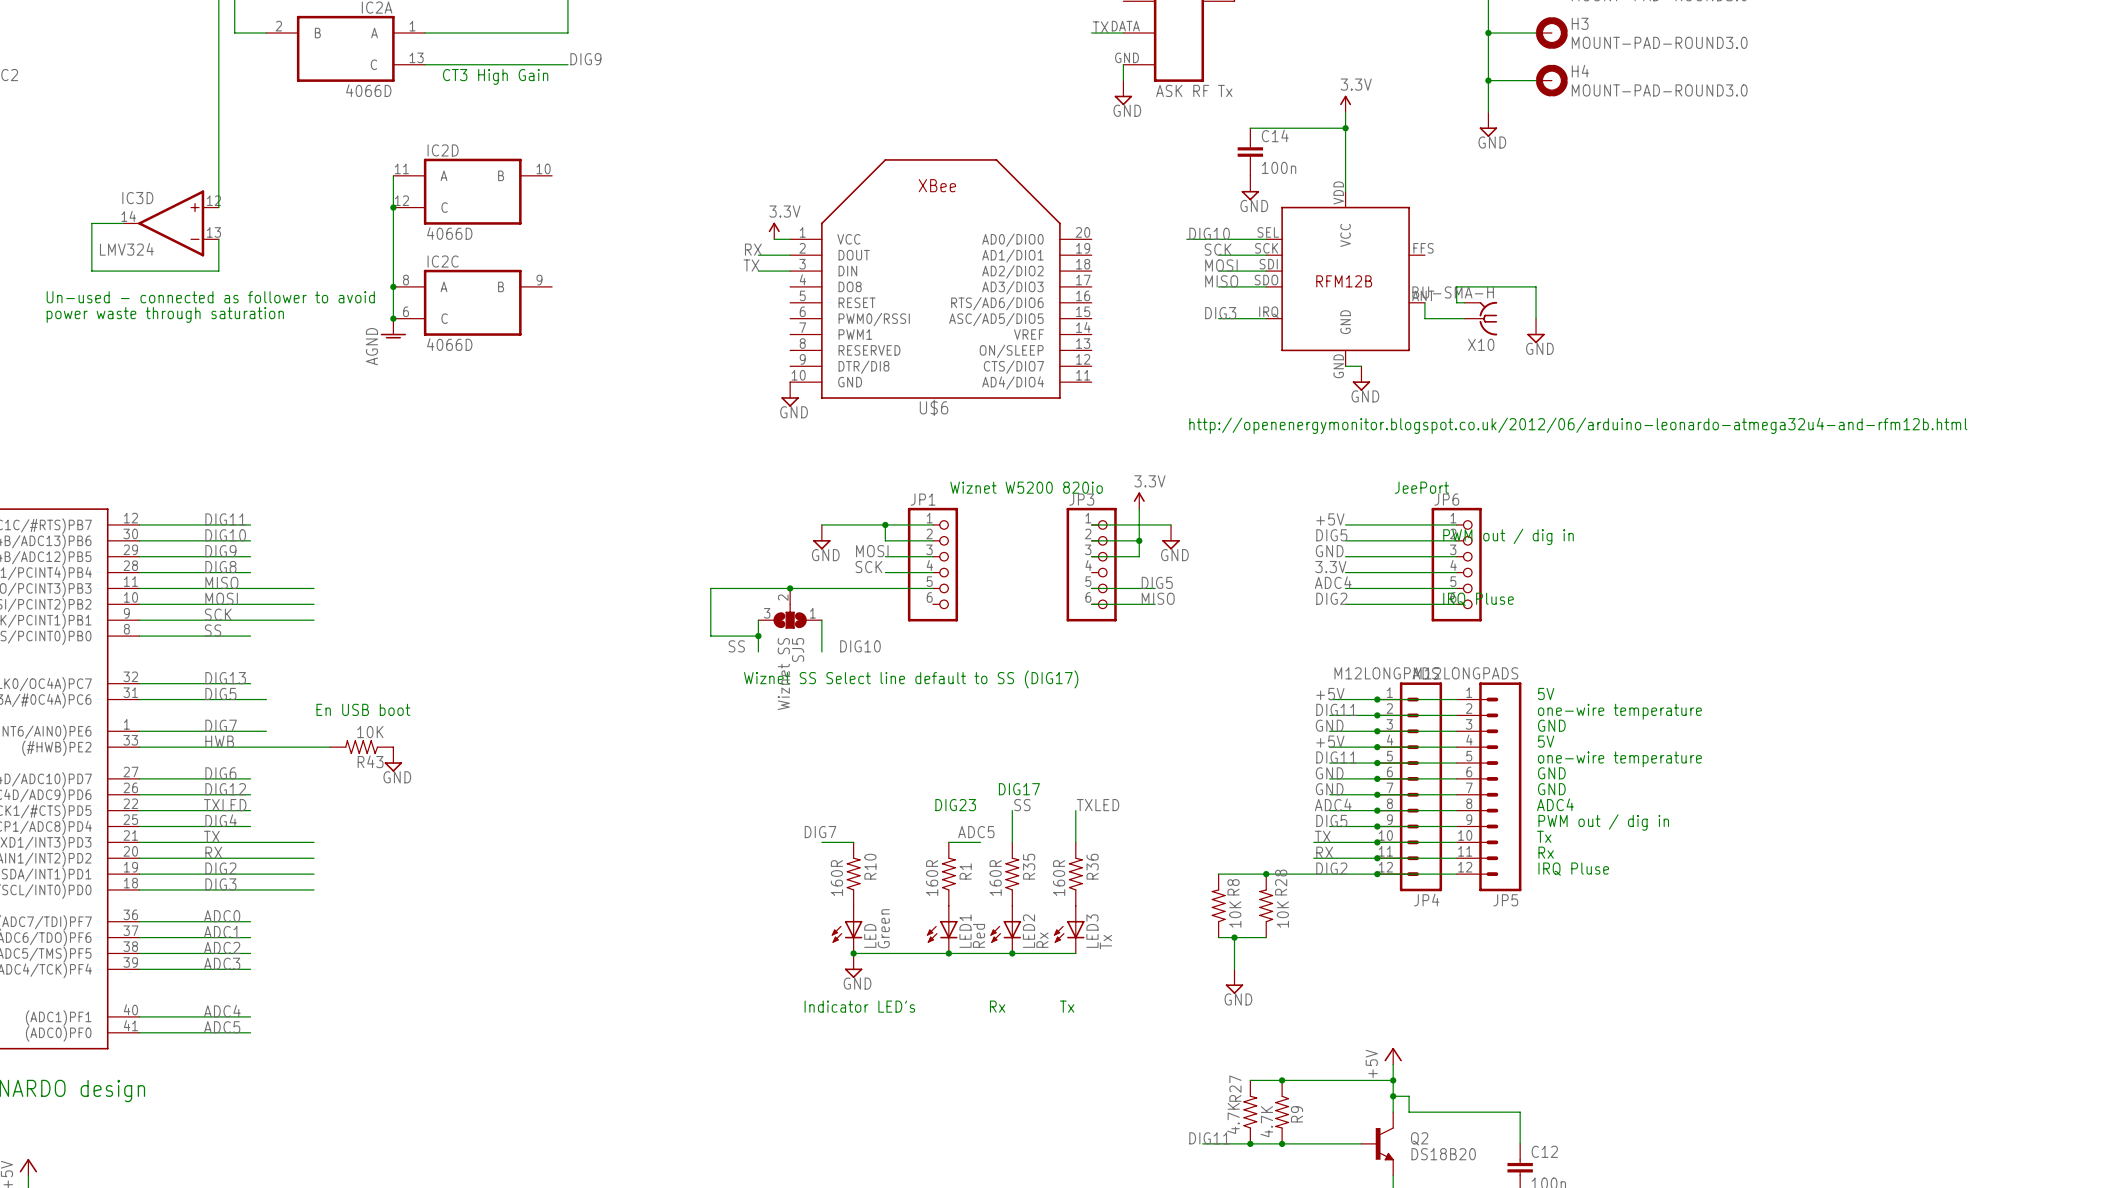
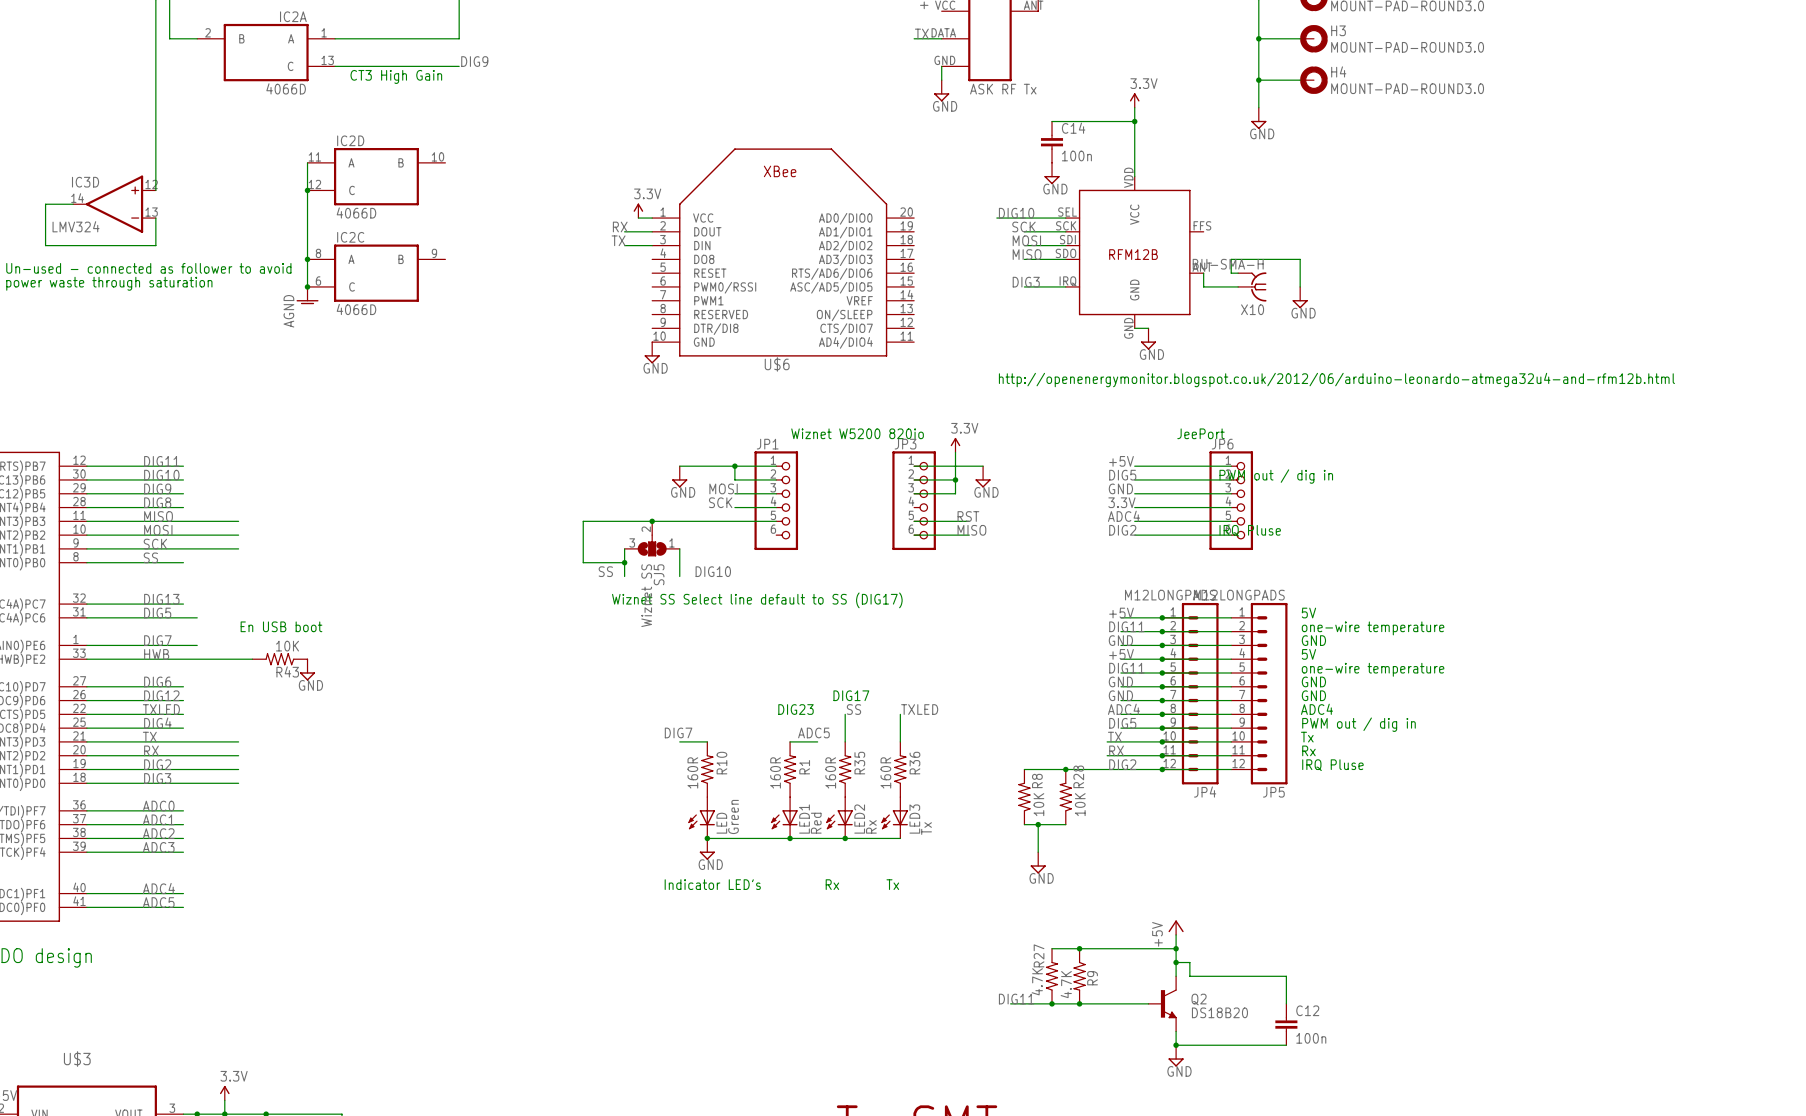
label: DIG5 (1157, 582) -> RST (968, 516)

